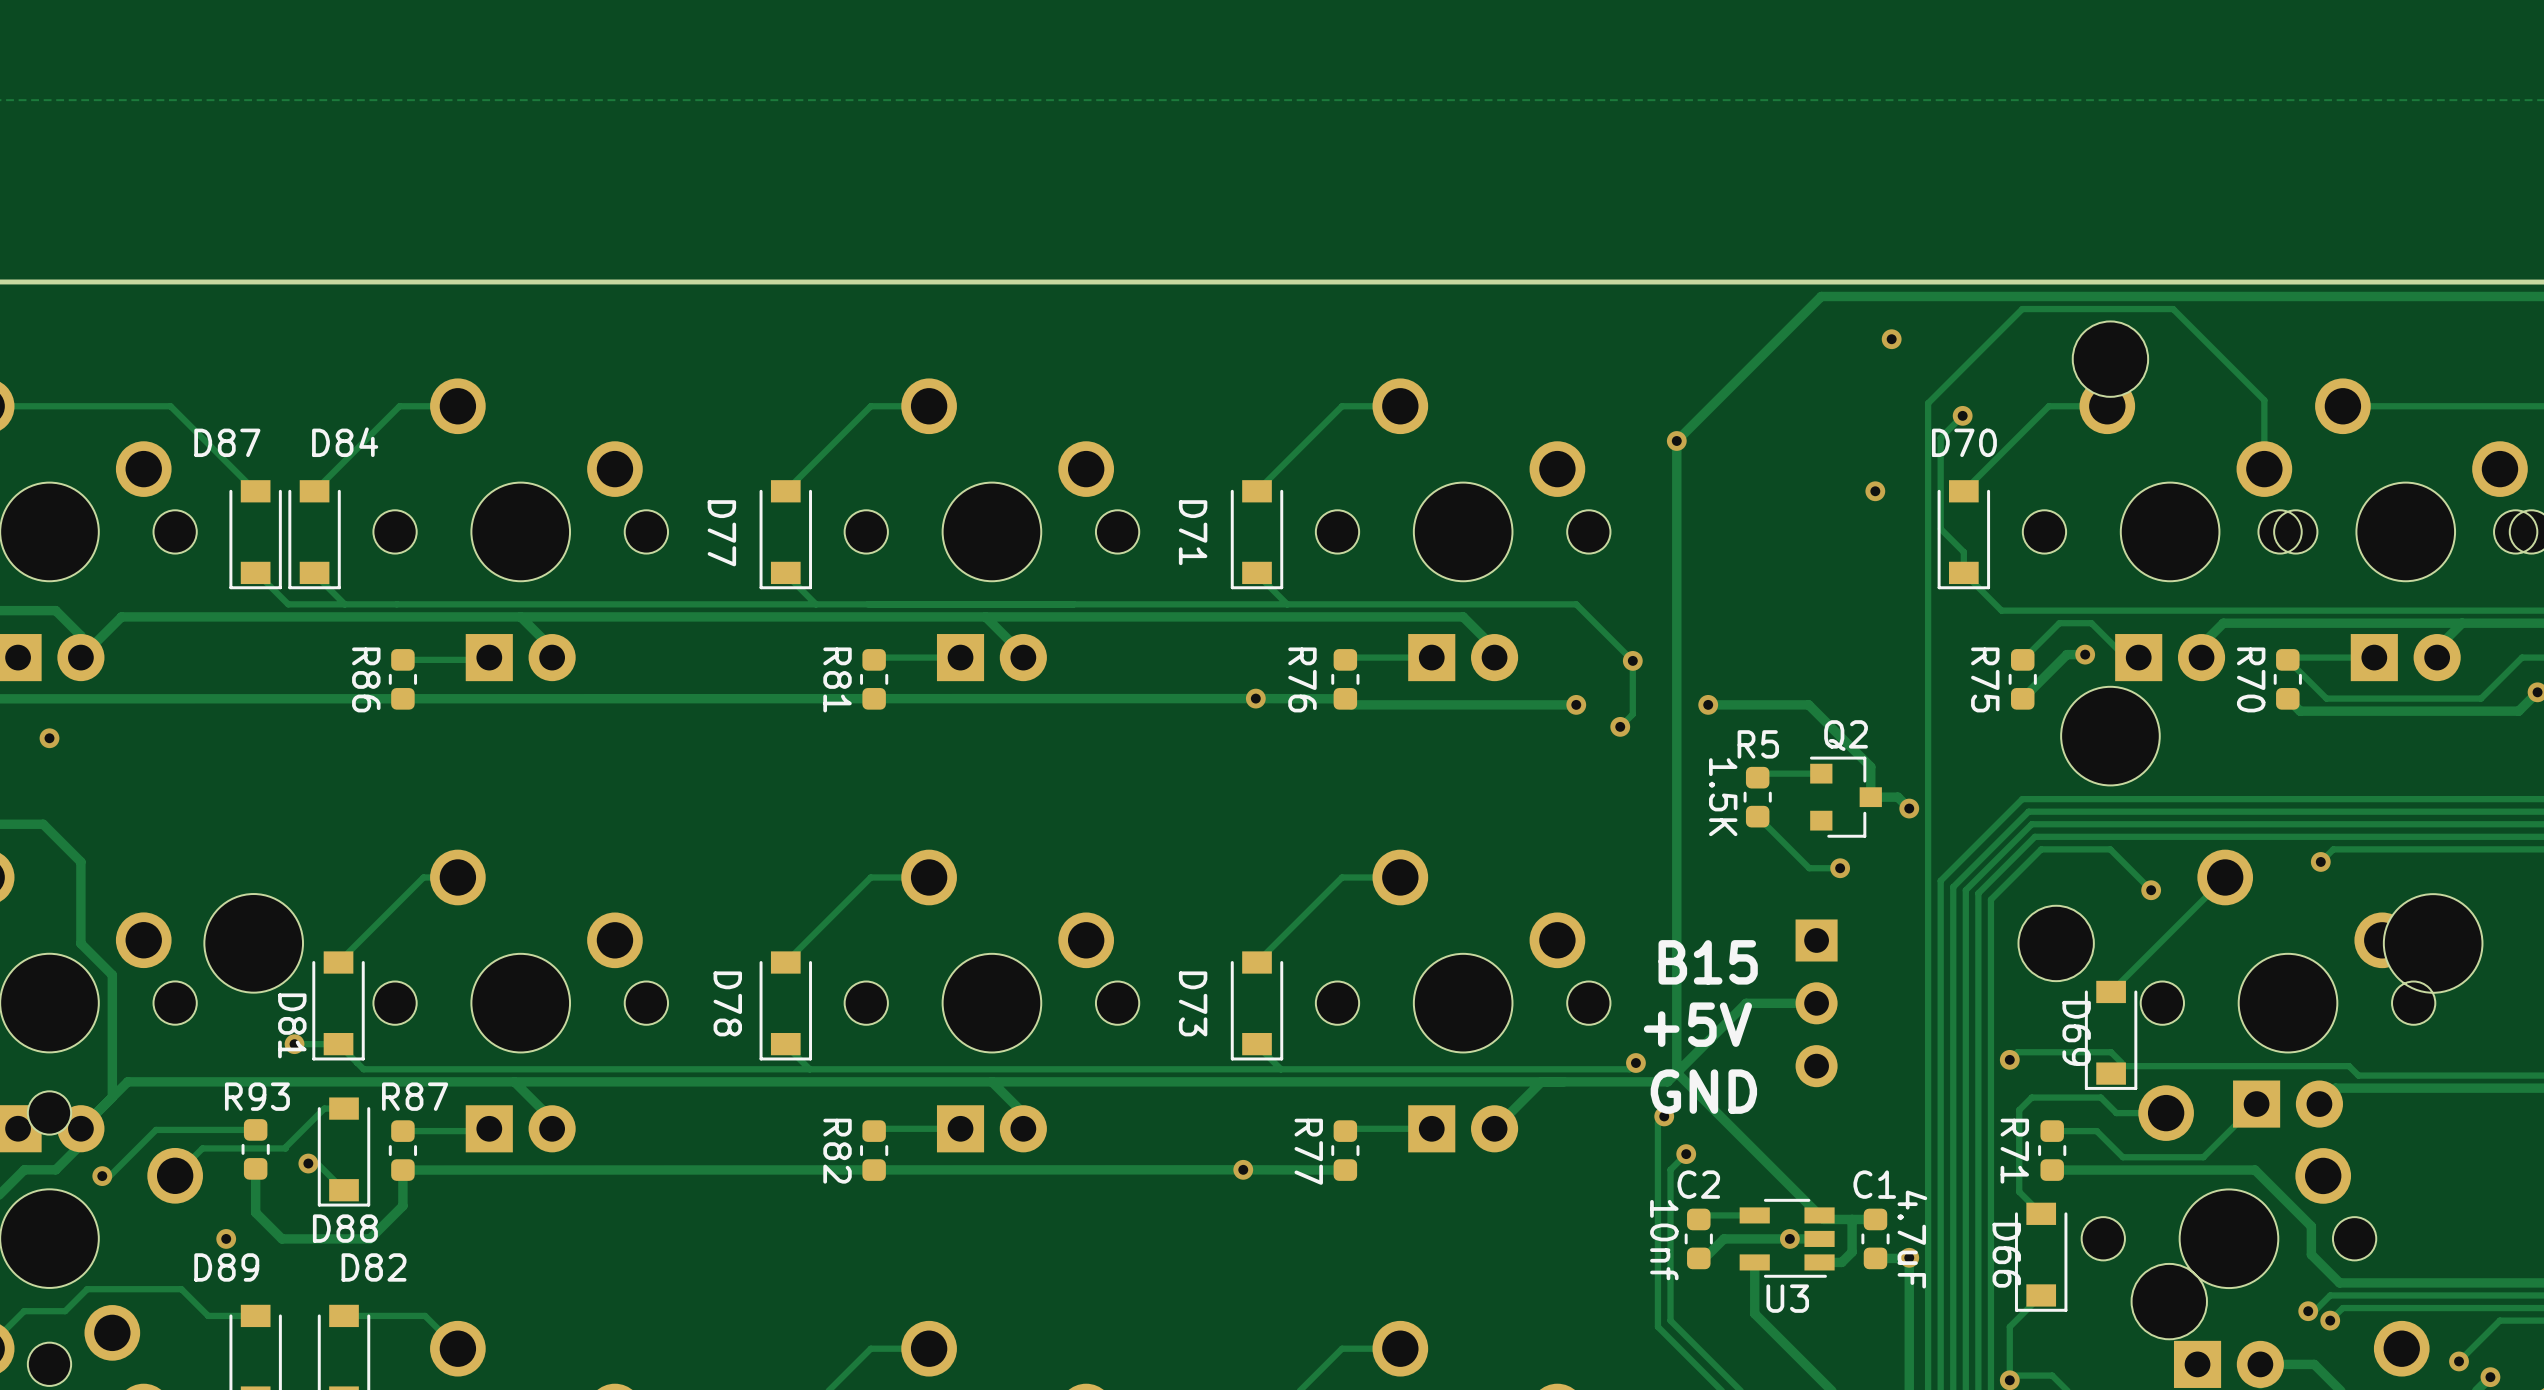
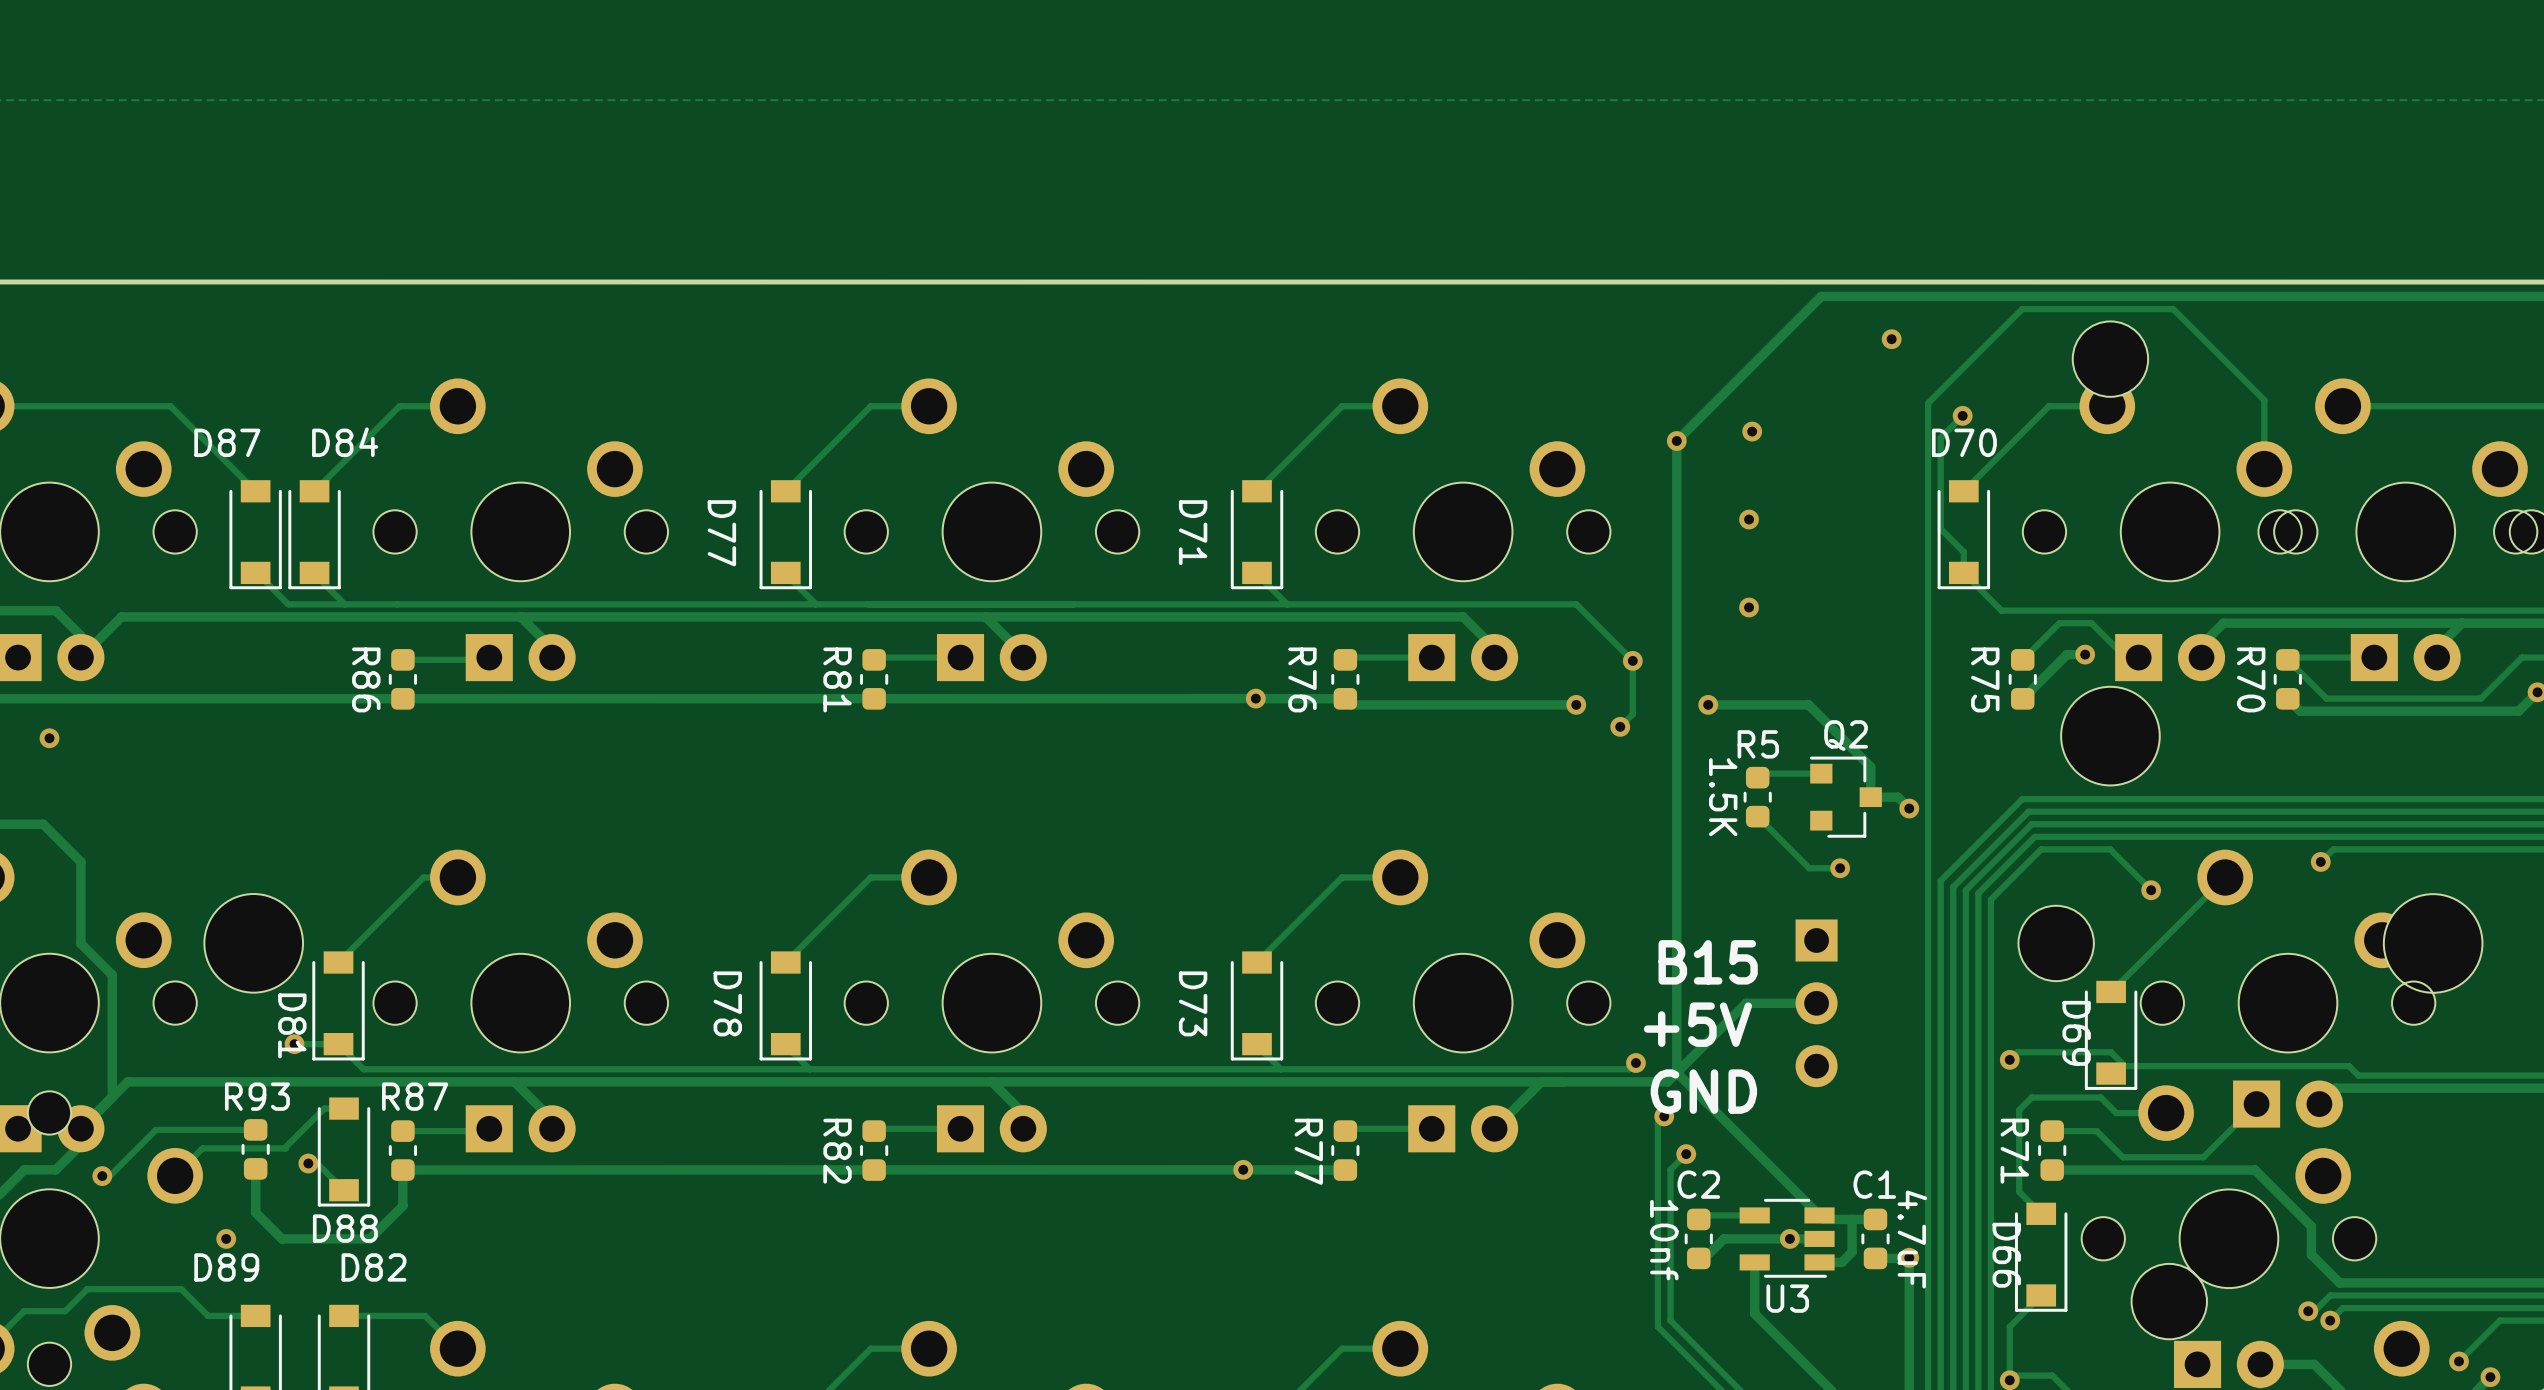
via: none -> (1752, 431)
via: (1875, 491) -> none
via: none -> (1749, 519)
via: none -> (1749, 607)

